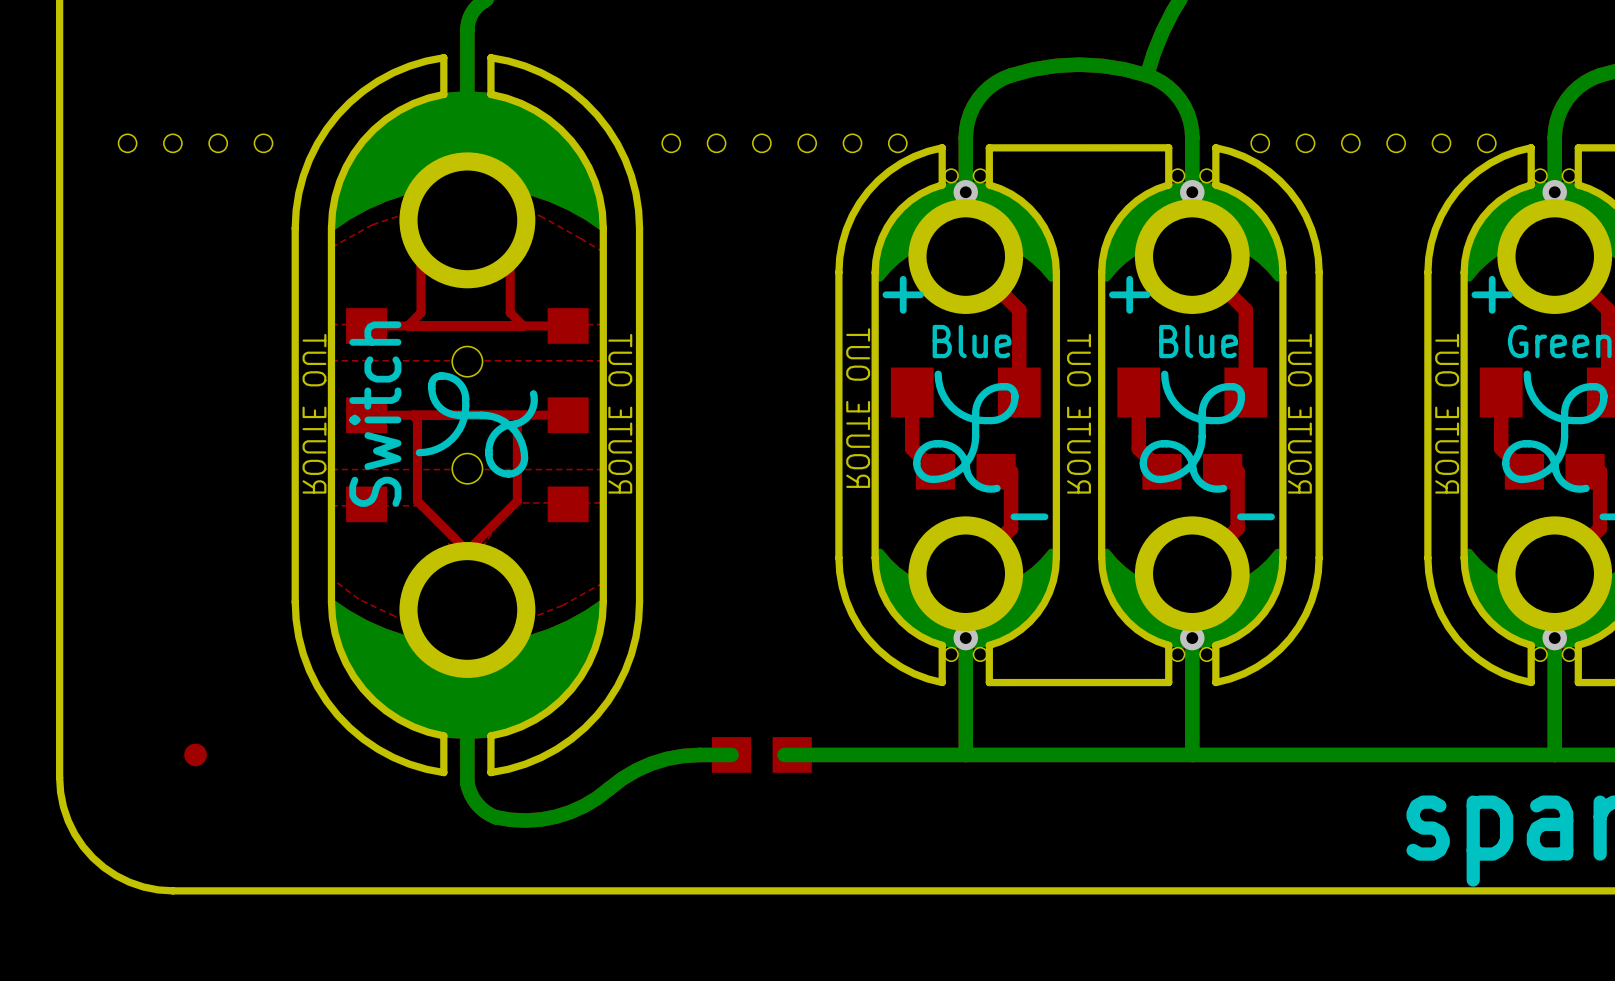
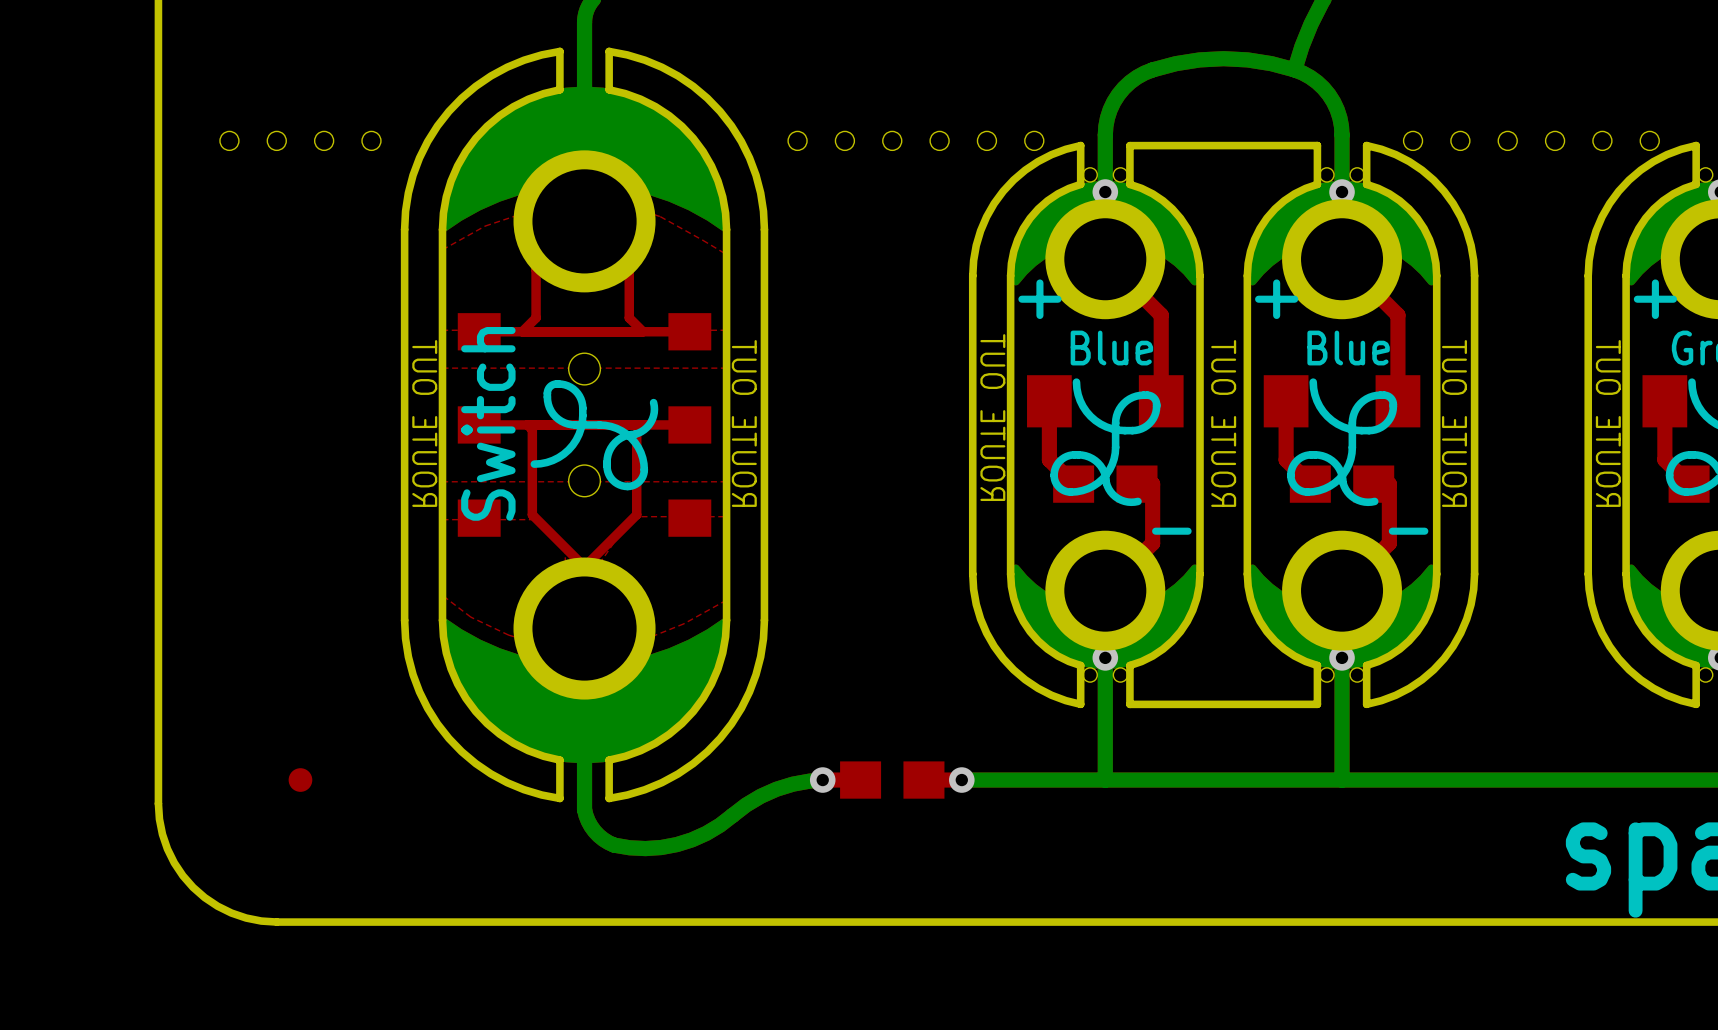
via: none -> (822, 780)
bottom track: (731, 754) (699, 754) -> none
bottom track: (828, 754) (784, 754) -> none
via: none -> (961, 780)

